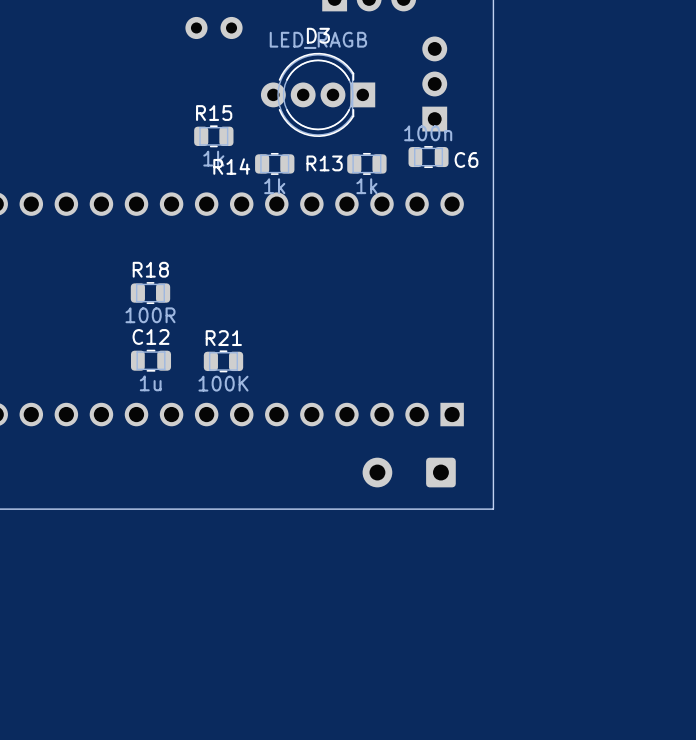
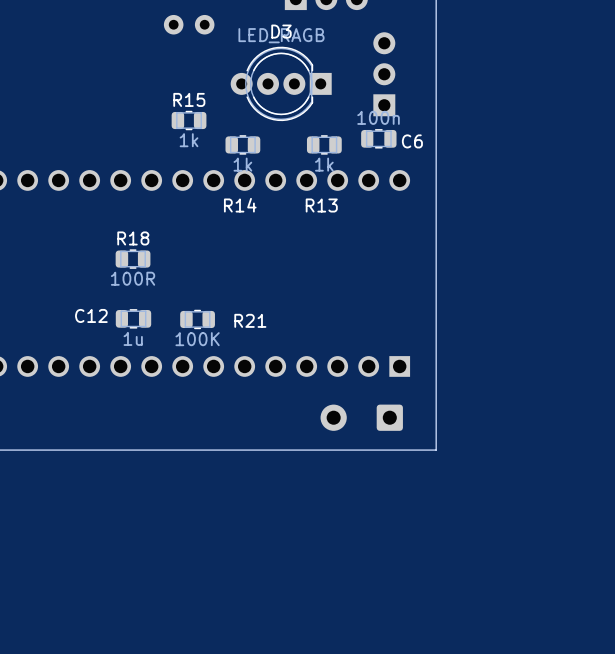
R13 name position: R13 (324, 163) -> R13 (321, 205)
R14 name position: R14 (231, 166) -> R14 (240, 205)
C12 name position: C12 (151, 336) -> C12 (91, 315)
R21 name position: R21 (223, 338) -> R21 (250, 320)

